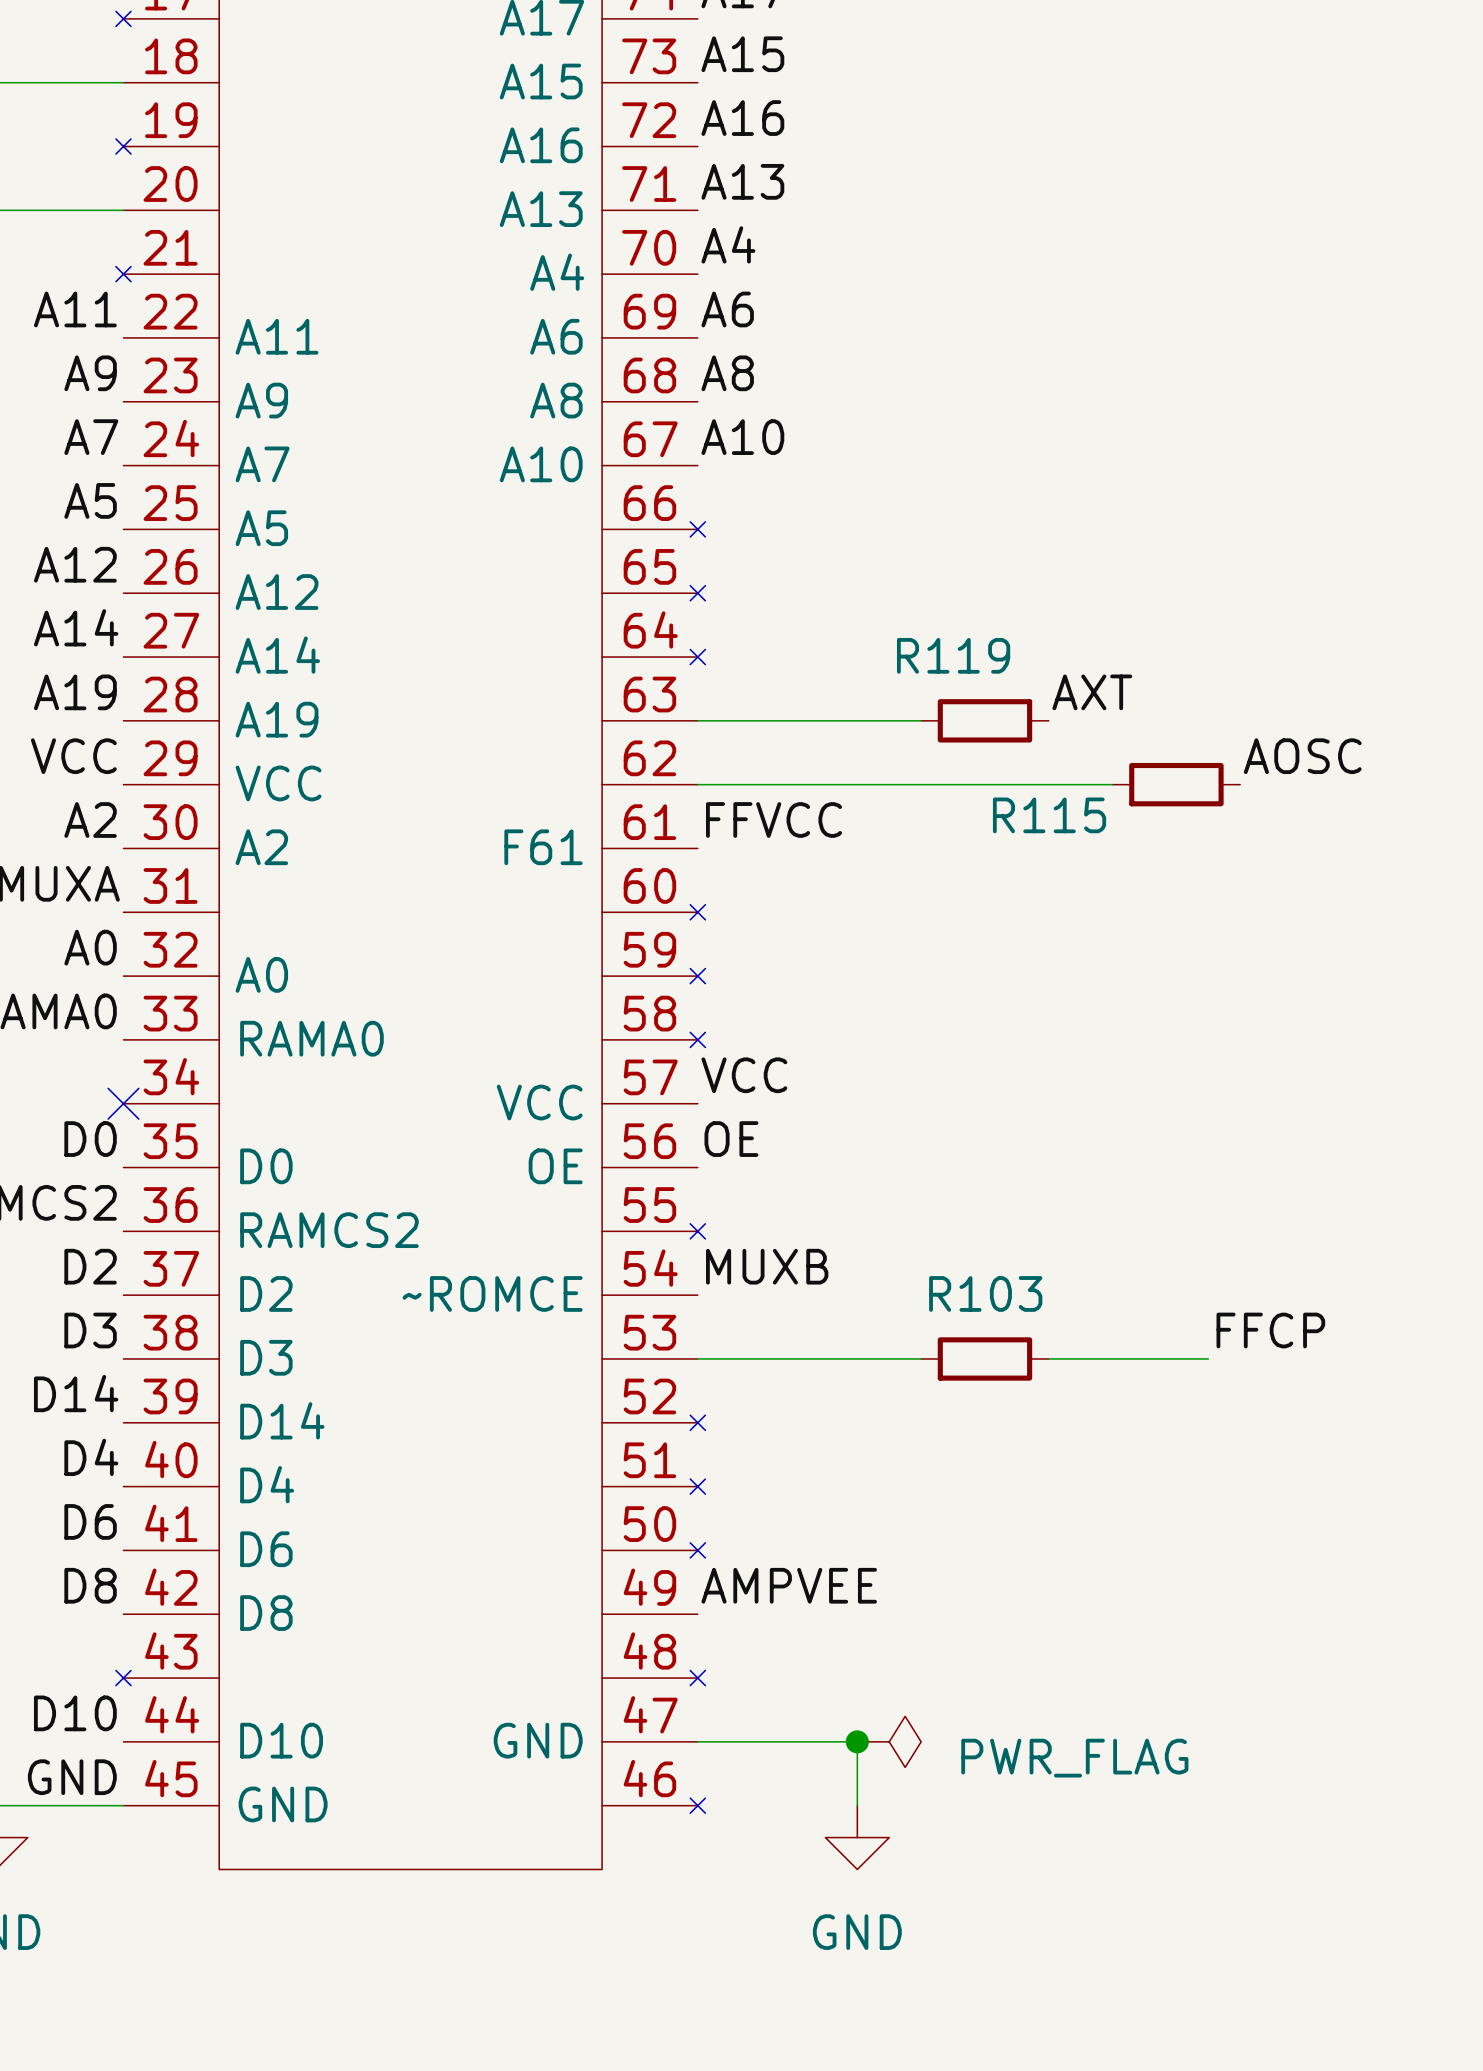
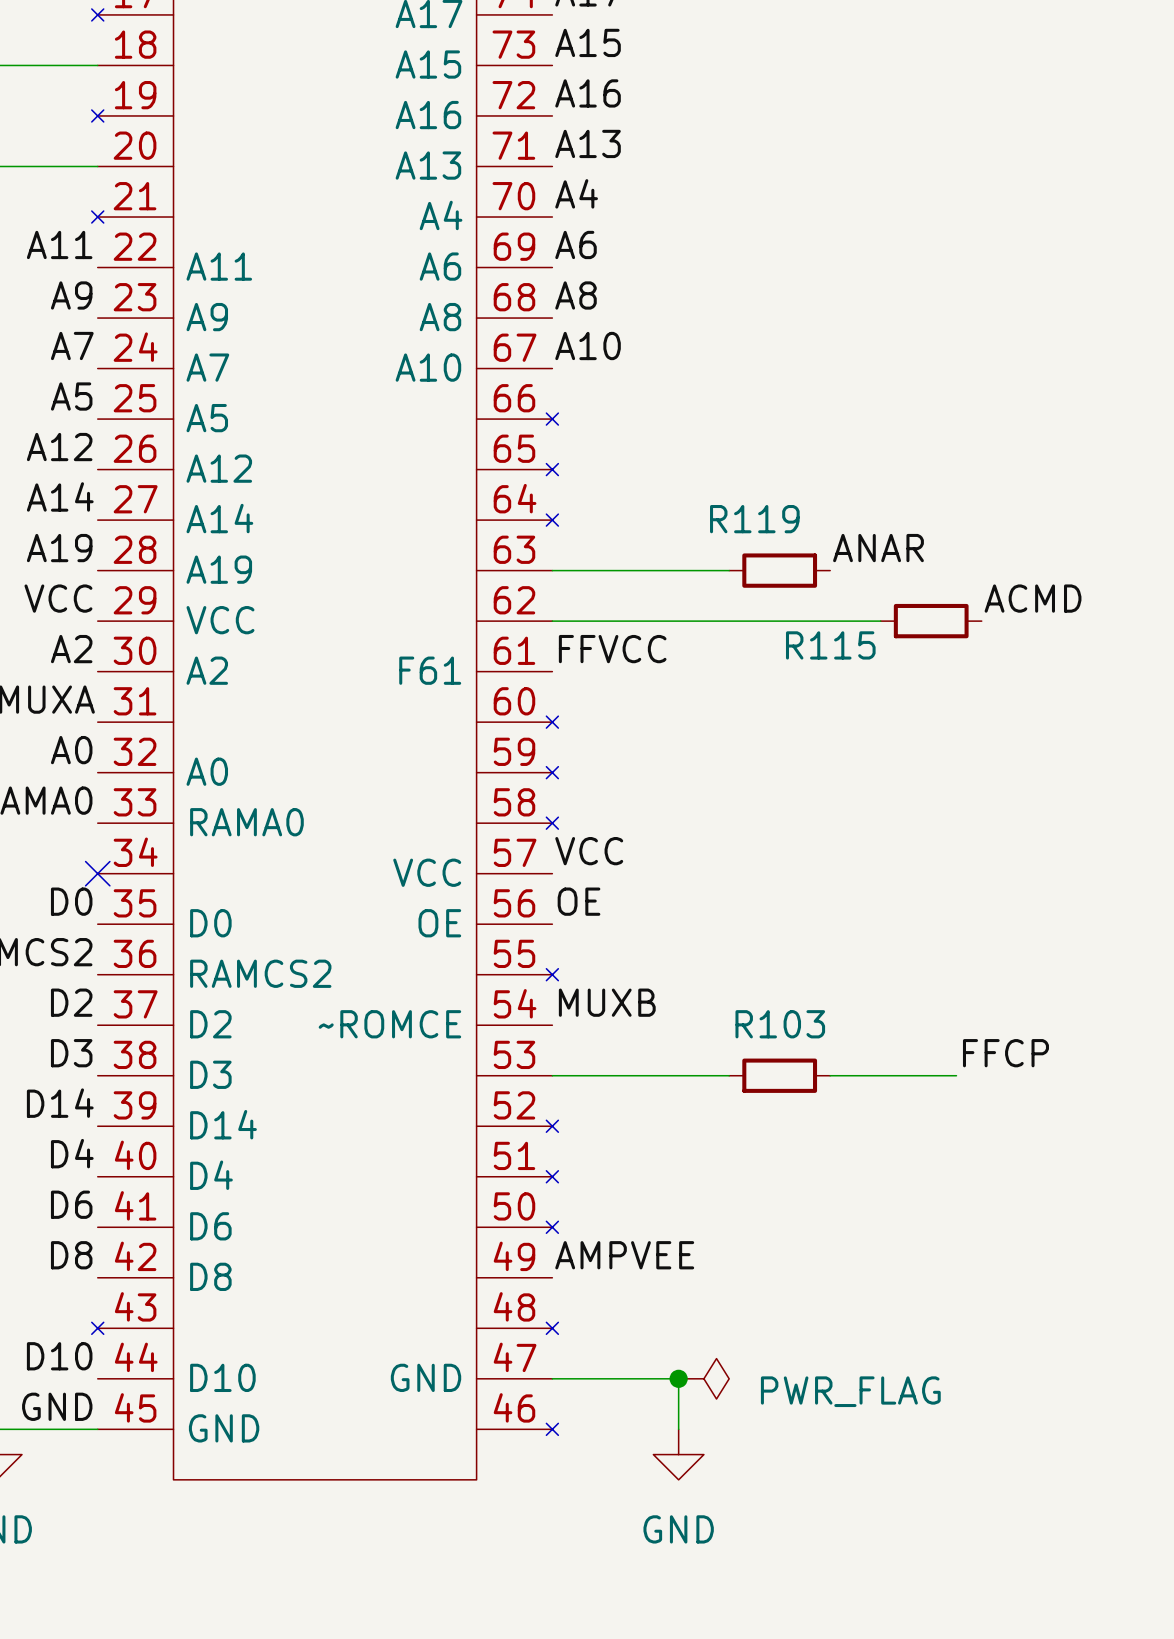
label: AXT (1092, 692) -> ANAR (878, 548)
label: AOSC (1302, 756) -> ACMD (1033, 598)

